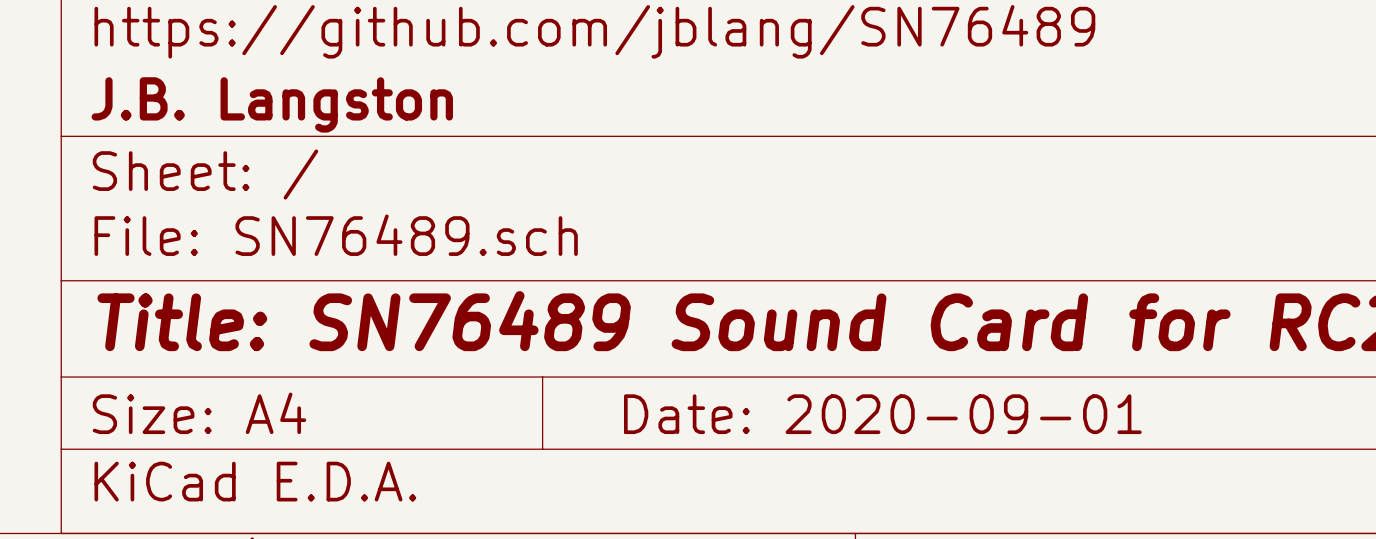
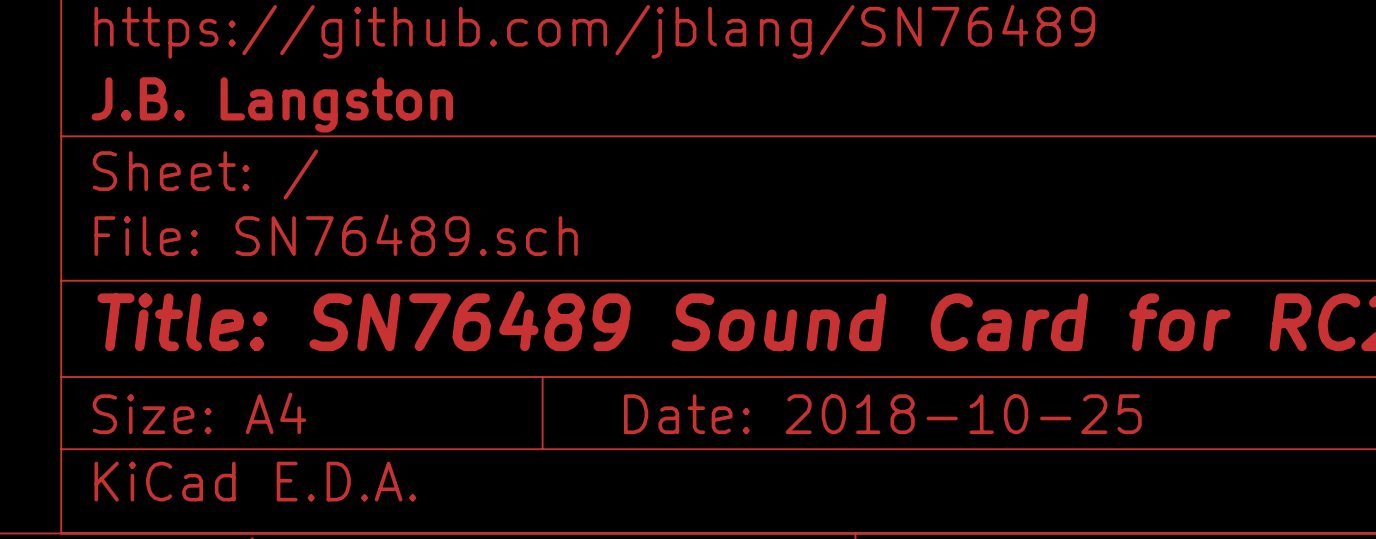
title block: Date: 2020-09-01 (882, 414) -> Date: 2018-10-25 (882, 414)

